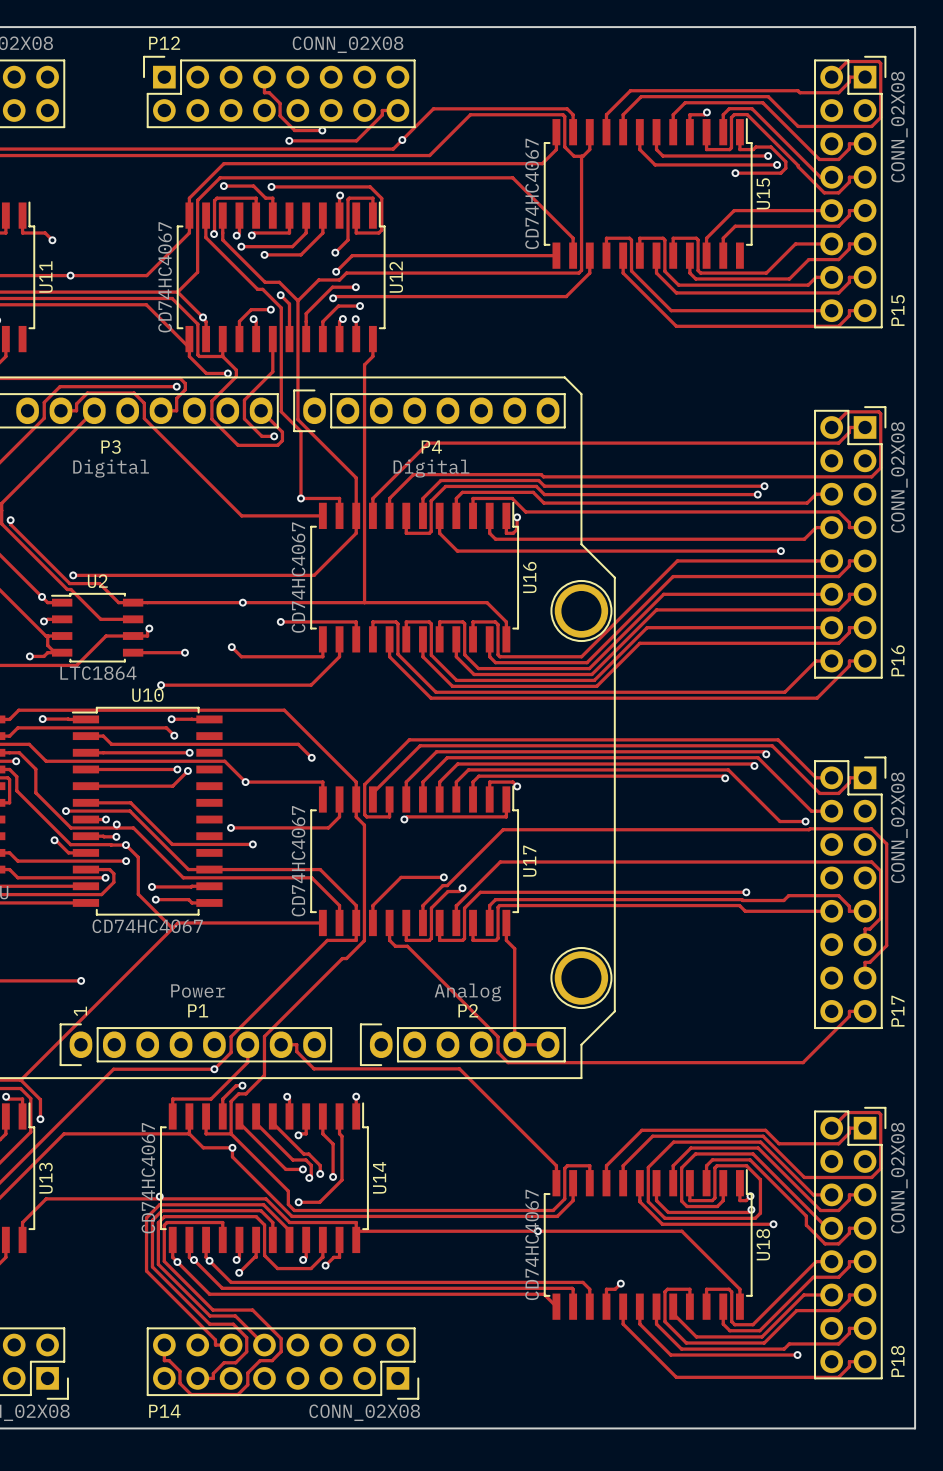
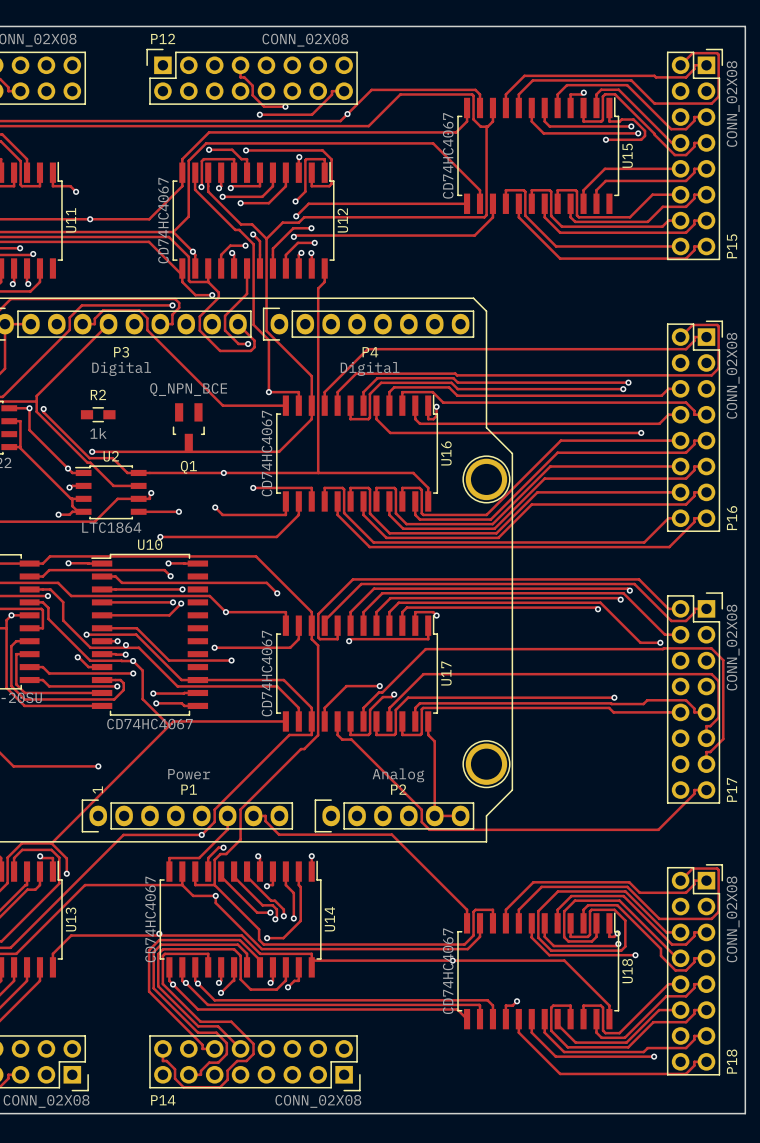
R2: none -> 1k (98, 414)
Q1: none -> Q_NPN_BCE (188, 427)

